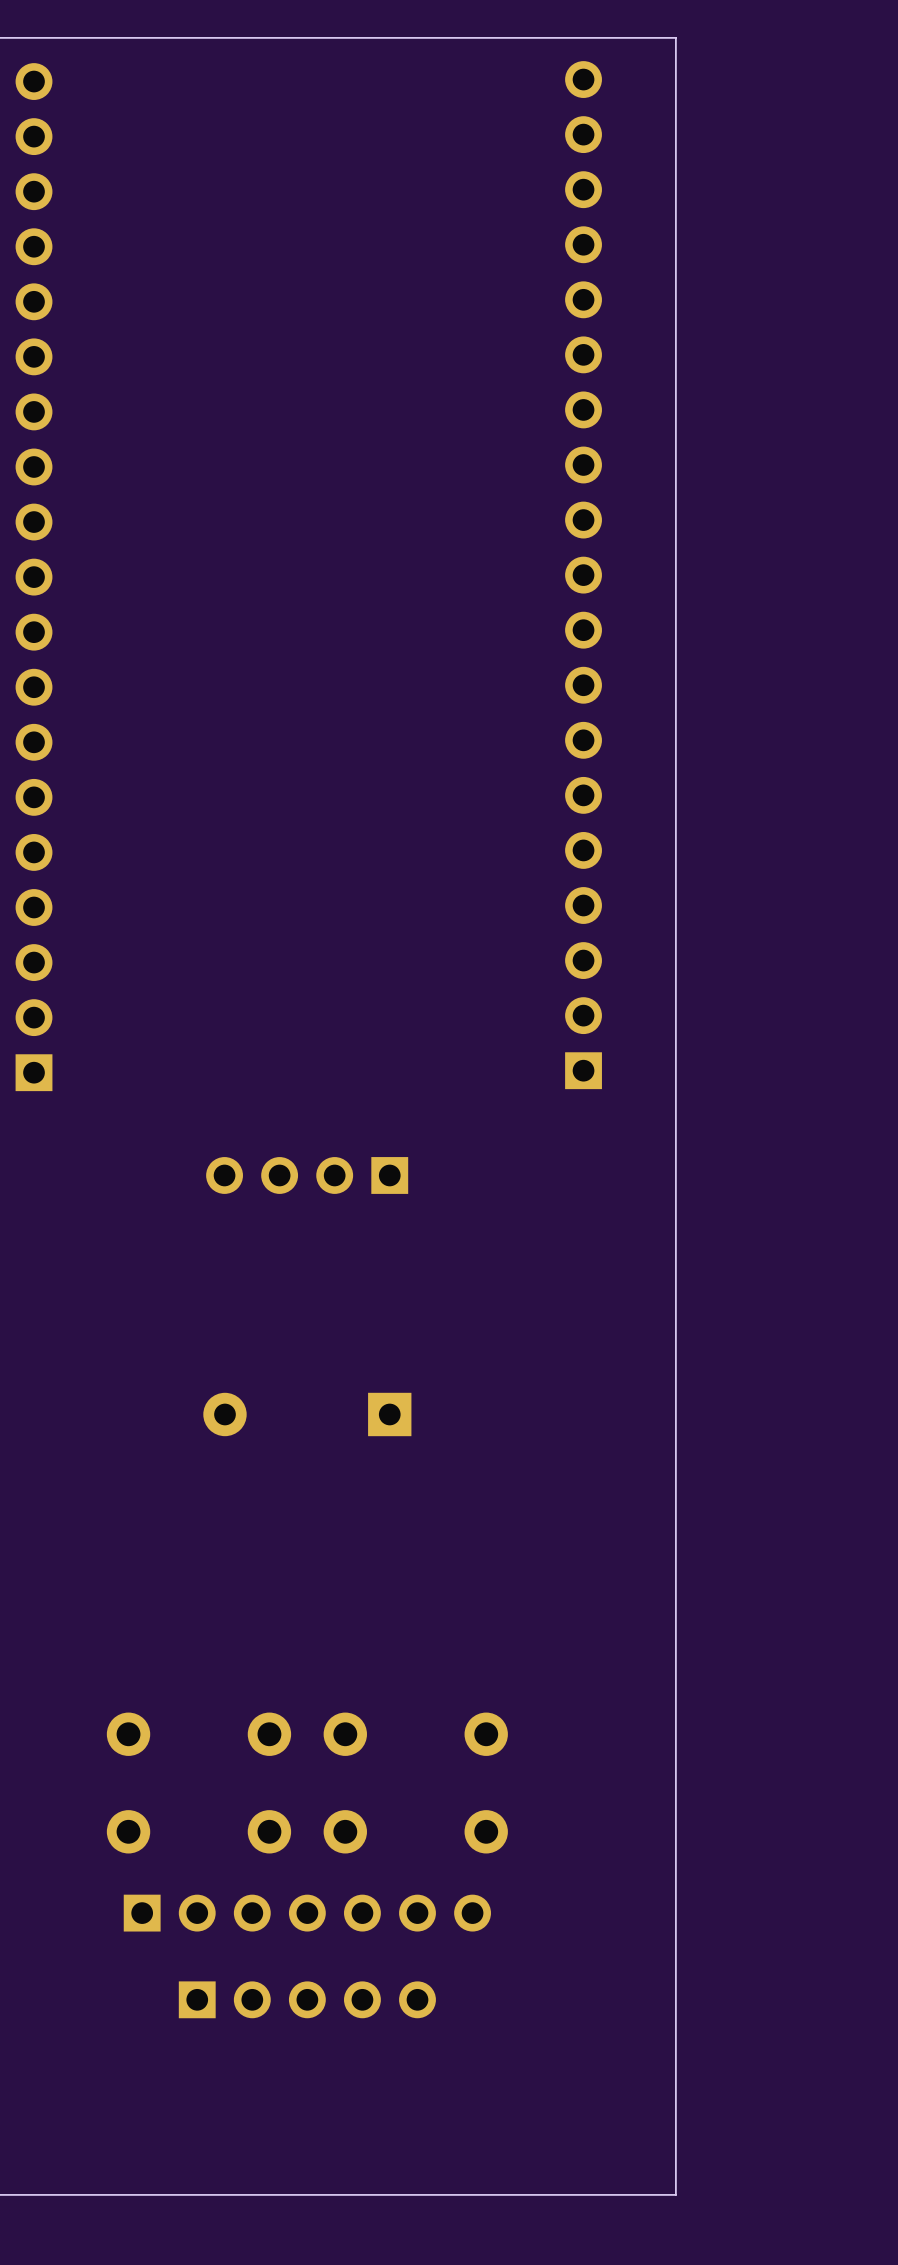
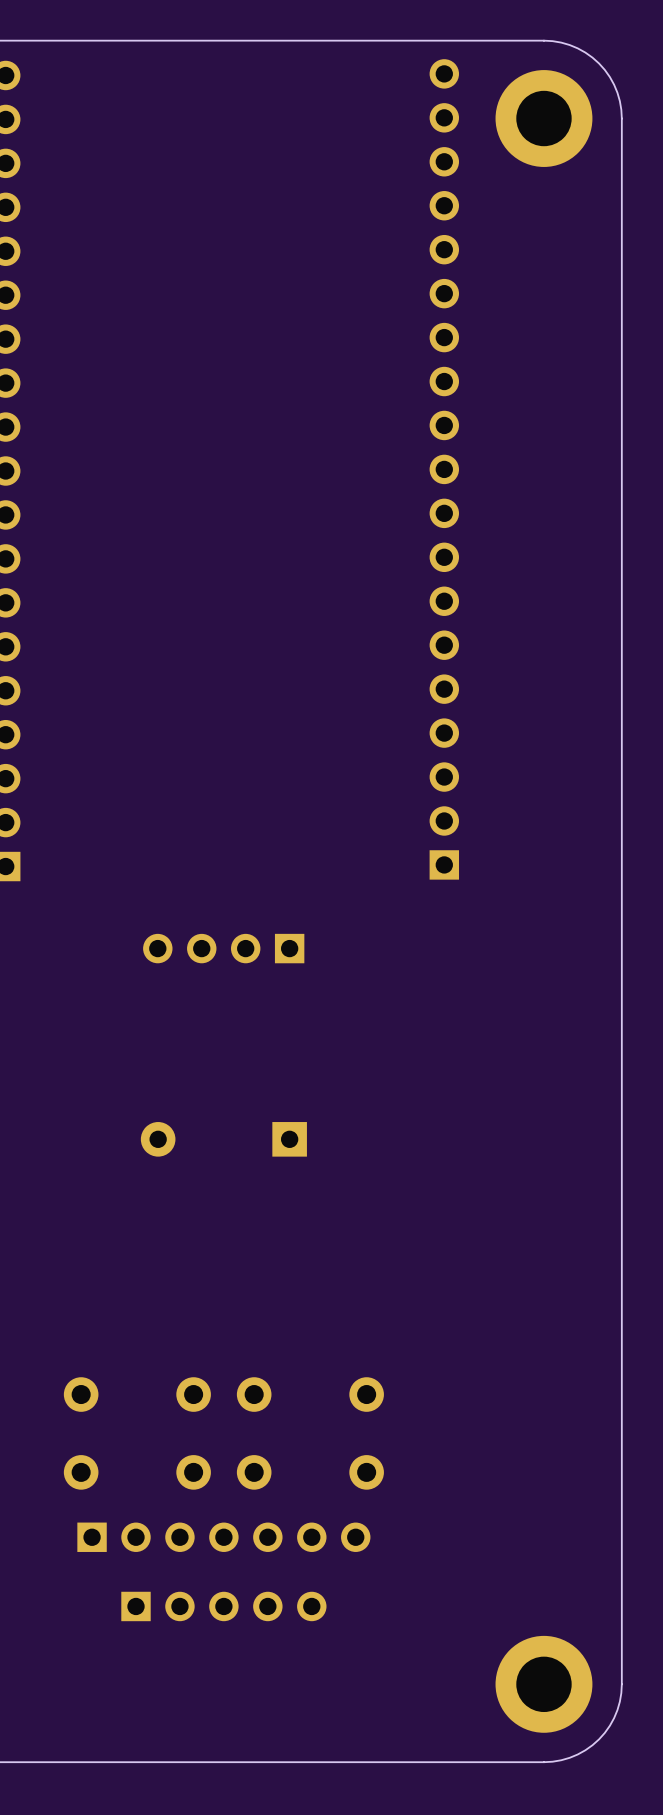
board edge: (675, 37) (675, 2194) -> (518, 40) (561, 42) (577, 48) (592, 57) (604, 69) (614, 84) (619, 101) (621, 118) (621, 1693) (617, 1710) (609, 1725) (599, 1739) (585, 1750) (561, 1760) (518, 1762)
part: none -> (543, 118)
part: none -> (543, 1684)

